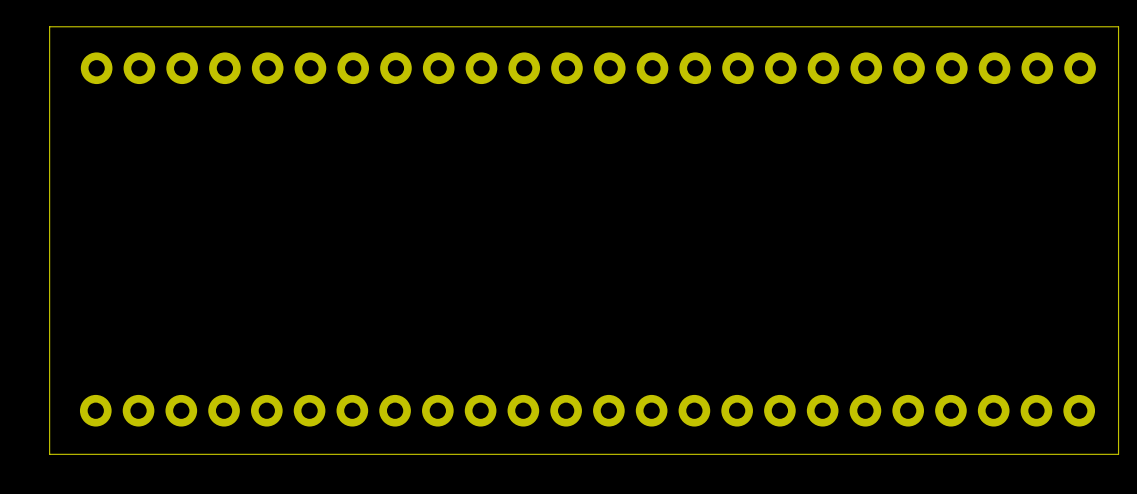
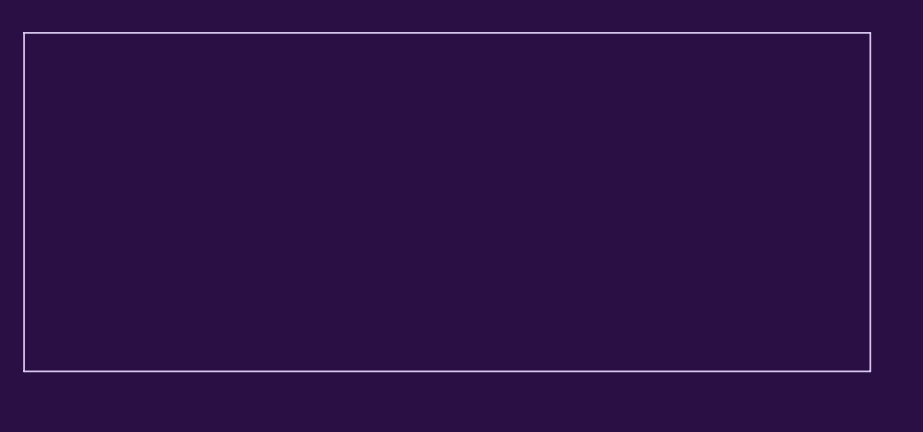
part: (588, 68) -> none
part: (587, 410) -> none

